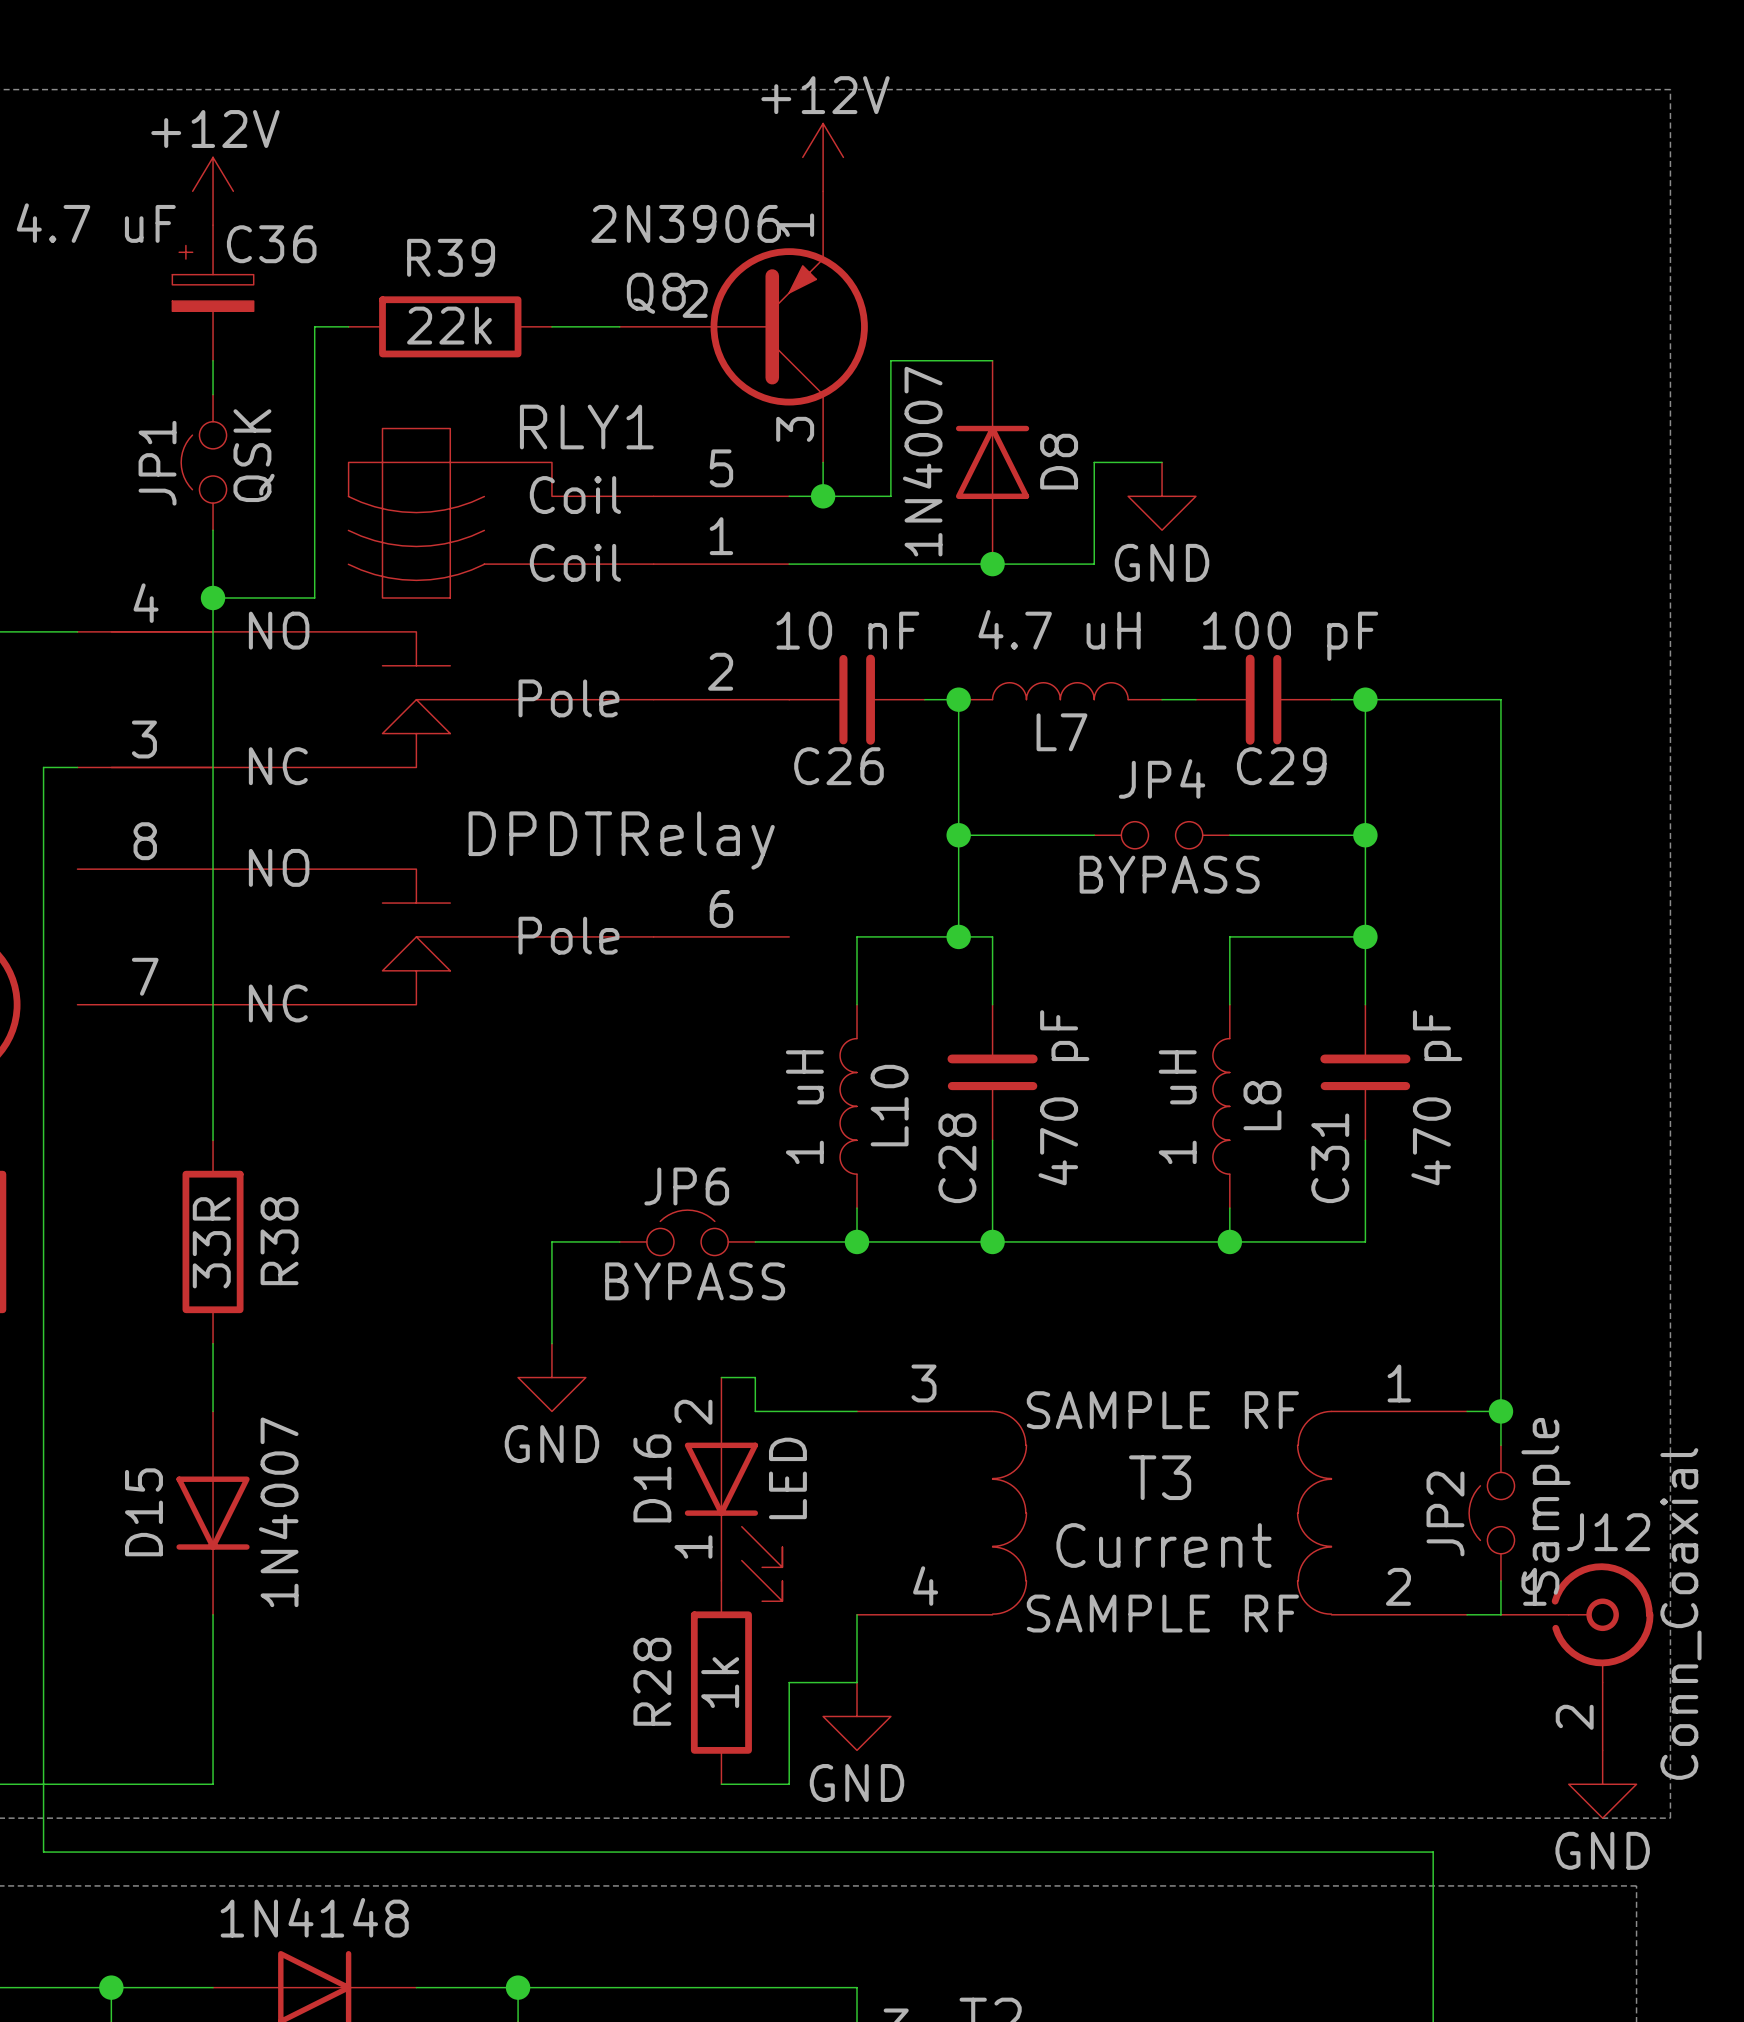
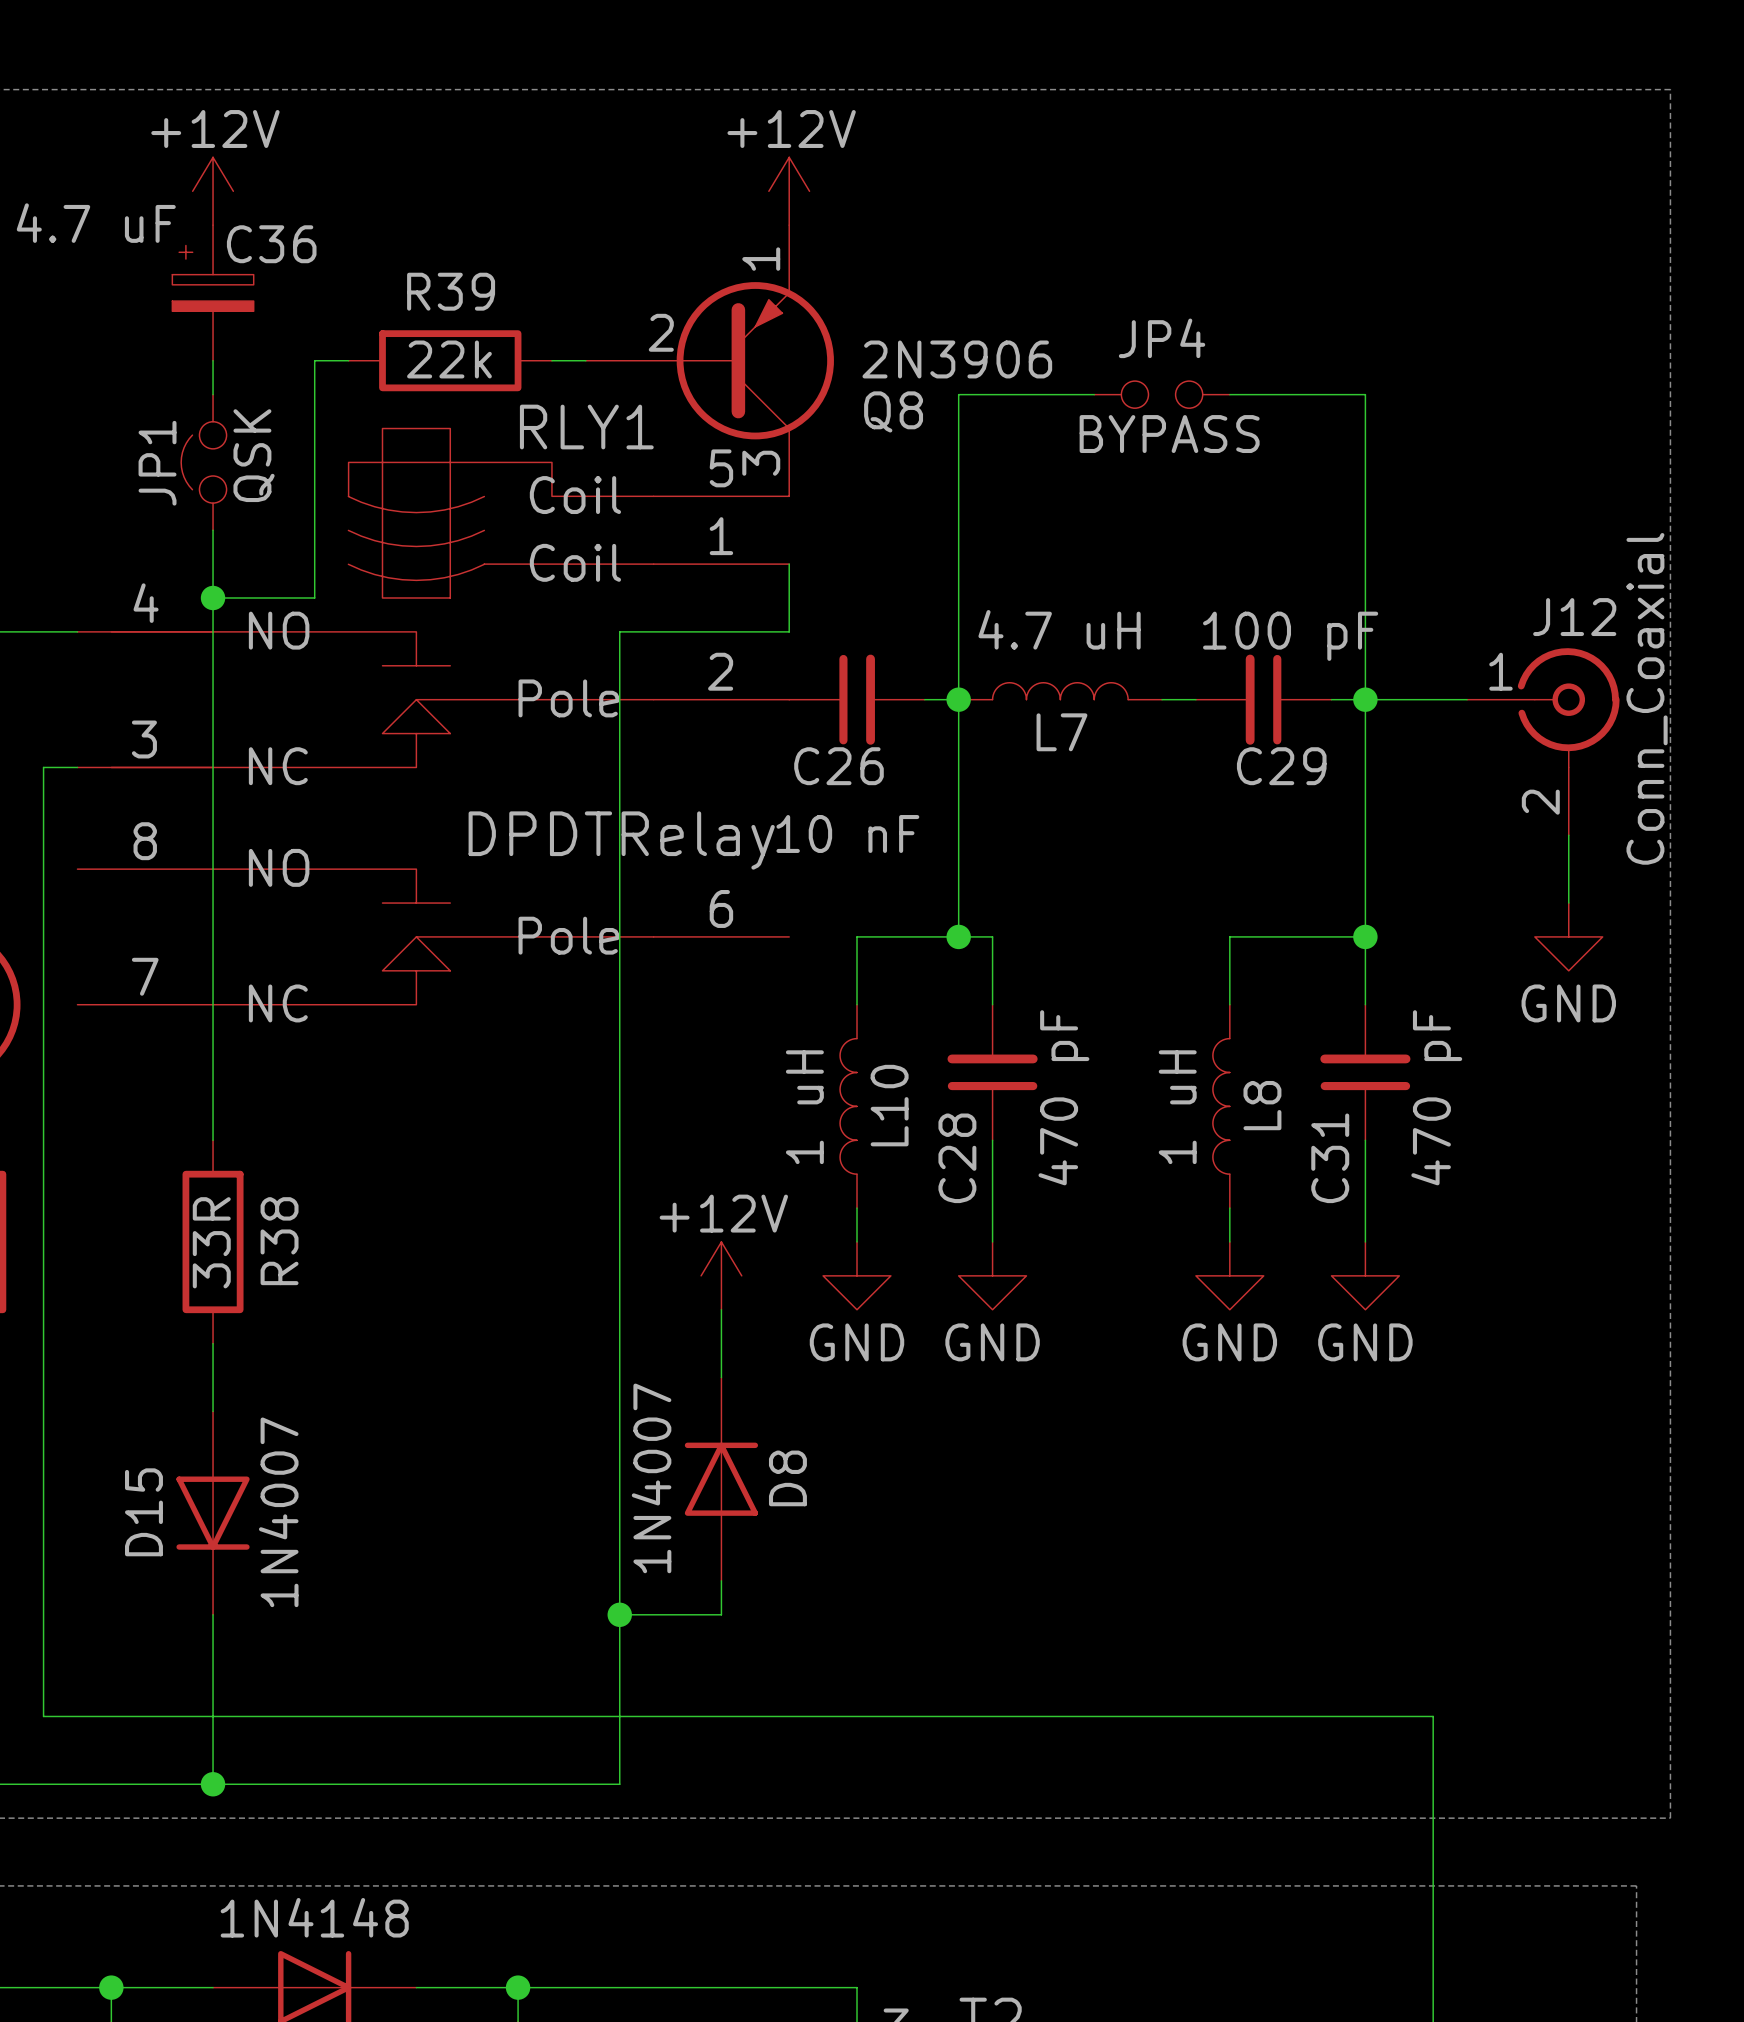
power symbol position: +12V (823, 157) -> +12V (789, 191)
Q8 value position: 2N3906 (686, 223) -> 2N3906 (957, 359)
Q8 name position: Q8 (656, 293) -> Q8 (893, 411)
wire: (348, 326) (314, 326) (314, 360) -> (348, 360) (314, 360)
R39 position: (450, 326) -> (450, 360)
wire: (551, 326) (619, 326) -> none
Q8 position: (743, 326) -> (709, 360)
wire: none -> (551, 360) (585, 360)
wire: (992, 360) (890, 360) (890, 496) (789, 496) -> none
wire: none -> (1094, 394) (958, 394) (958, 699)
wire: none -> (1229, 394) (1365, 394) (1365, 699)
wire: (823, 462) (823, 496) -> none
D8 position: (992, 462) -> (721, 1479)
wire: (1162, 462) (1094, 462) (1094, 564) (789, 564) -> (213, 1784) (619, 1784) (619, 631) (789, 631) (789, 564)
junction: (823, 496) -> none
power symbol: GND (1162, 496) -> none
junction: (992, 564) -> none
C26 value position: 10 nF (847, 630) -> 10 nF (847, 833)
wire: (1467, 699) (1500, 699) (1500, 1445) -> none
wire: (958, 835) (1094, 835) -> none
junction: (958, 835) -> none
JP4 position: (1162, 835) -> (1162, 394)
wire: (1229, 835) (1365, 835) -> none
junction: (1365, 835) -> none
wire: none -> (1568, 835) (1568, 903)
power symbol: none -> GND (1568, 936)
JP6: BYPASS (687, 1232) -> none
wire: (619, 1241) (551, 1241) (551, 1343) -> none
wire: (755, 1241) (1365, 1241) -> none
junction: (857, 1241) -> none
junction: (992, 1241) -> none
junction: (1229, 1241) -> none
power symbol: none -> +12V (721, 1275)
power symbol: none -> GND (857, 1275)
power symbol: none -> GND (992, 1275)
power symbol: none -> GND (1229, 1275)
power symbol: none -> GND (1365, 1275)
power symbol: GND (551, 1377) -> none
wire: (721, 1377) (755, 1377) (755, 1411) (857, 1411) -> (721, 1377) (721, 1309)
wire: (1467, 1411) (1500, 1411) -> none
junction: (1500, 1411) -> none
D16: LED (733, 1489) -> none
T3: Current (1162, 1513) -> none
JP2: Sample (1491, 1513) -> none
wire: none -> (721, 1580) (721, 1614) (619, 1614)
wire: (1500, 1580) (1500, 1614) (1467, 1614) -> none
junction: none -> (619, 1614)
wire: (857, 1614) (857, 1682) (789, 1682) (789, 1784) (721, 1784) -> none
J12 position: (1577, 1656) -> (1543, 741)
R28: 1k (721, 1682) -> none
wire: (43, 1716) (43, 1852) (1433, 1852) -> (43, 1716) (1433, 1716) (1433, 1852)
power symbol: GND (857, 1716) -> none
junction: none -> (213, 1784)
power symbol: GND (1602, 1784) -> none

